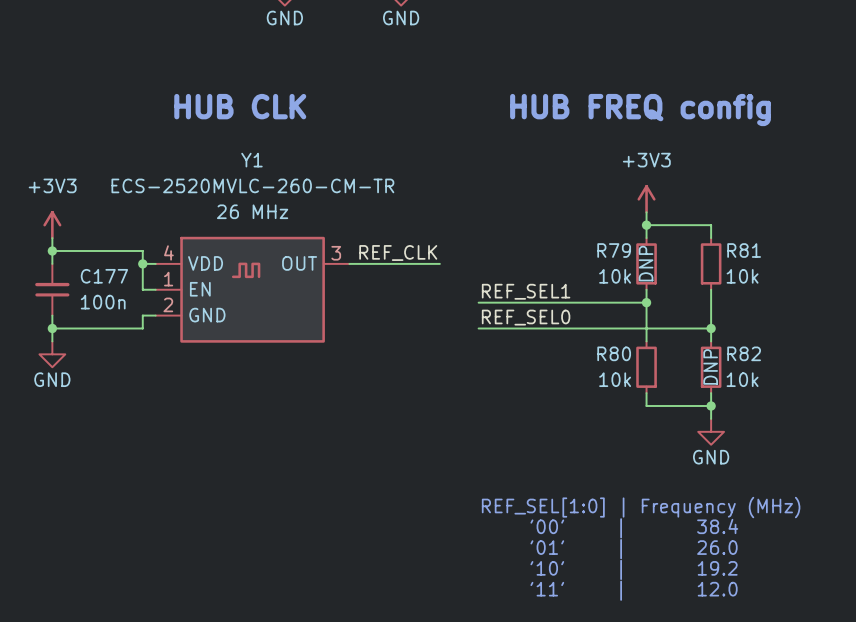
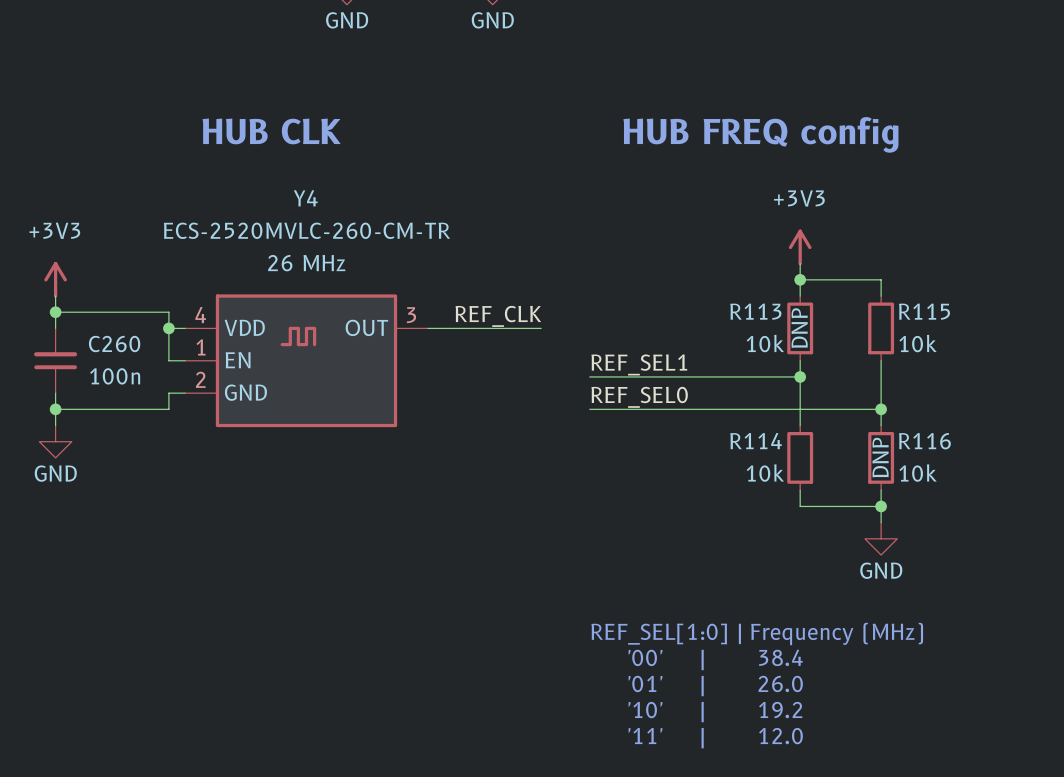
Y1 name: Y1 (251, 160) -> Y4 (305, 198)
R79 name: R79 (614, 250) -> R113 (755, 311)
R81 name: R81 (744, 250) -> R115 (924, 311)
C177 name: C177 (104, 276) -> C260 (114, 344)
R80 name: R80 (614, 353) -> R114 (756, 441)
R82 name: R82 (744, 353) -> R116 (924, 441)

